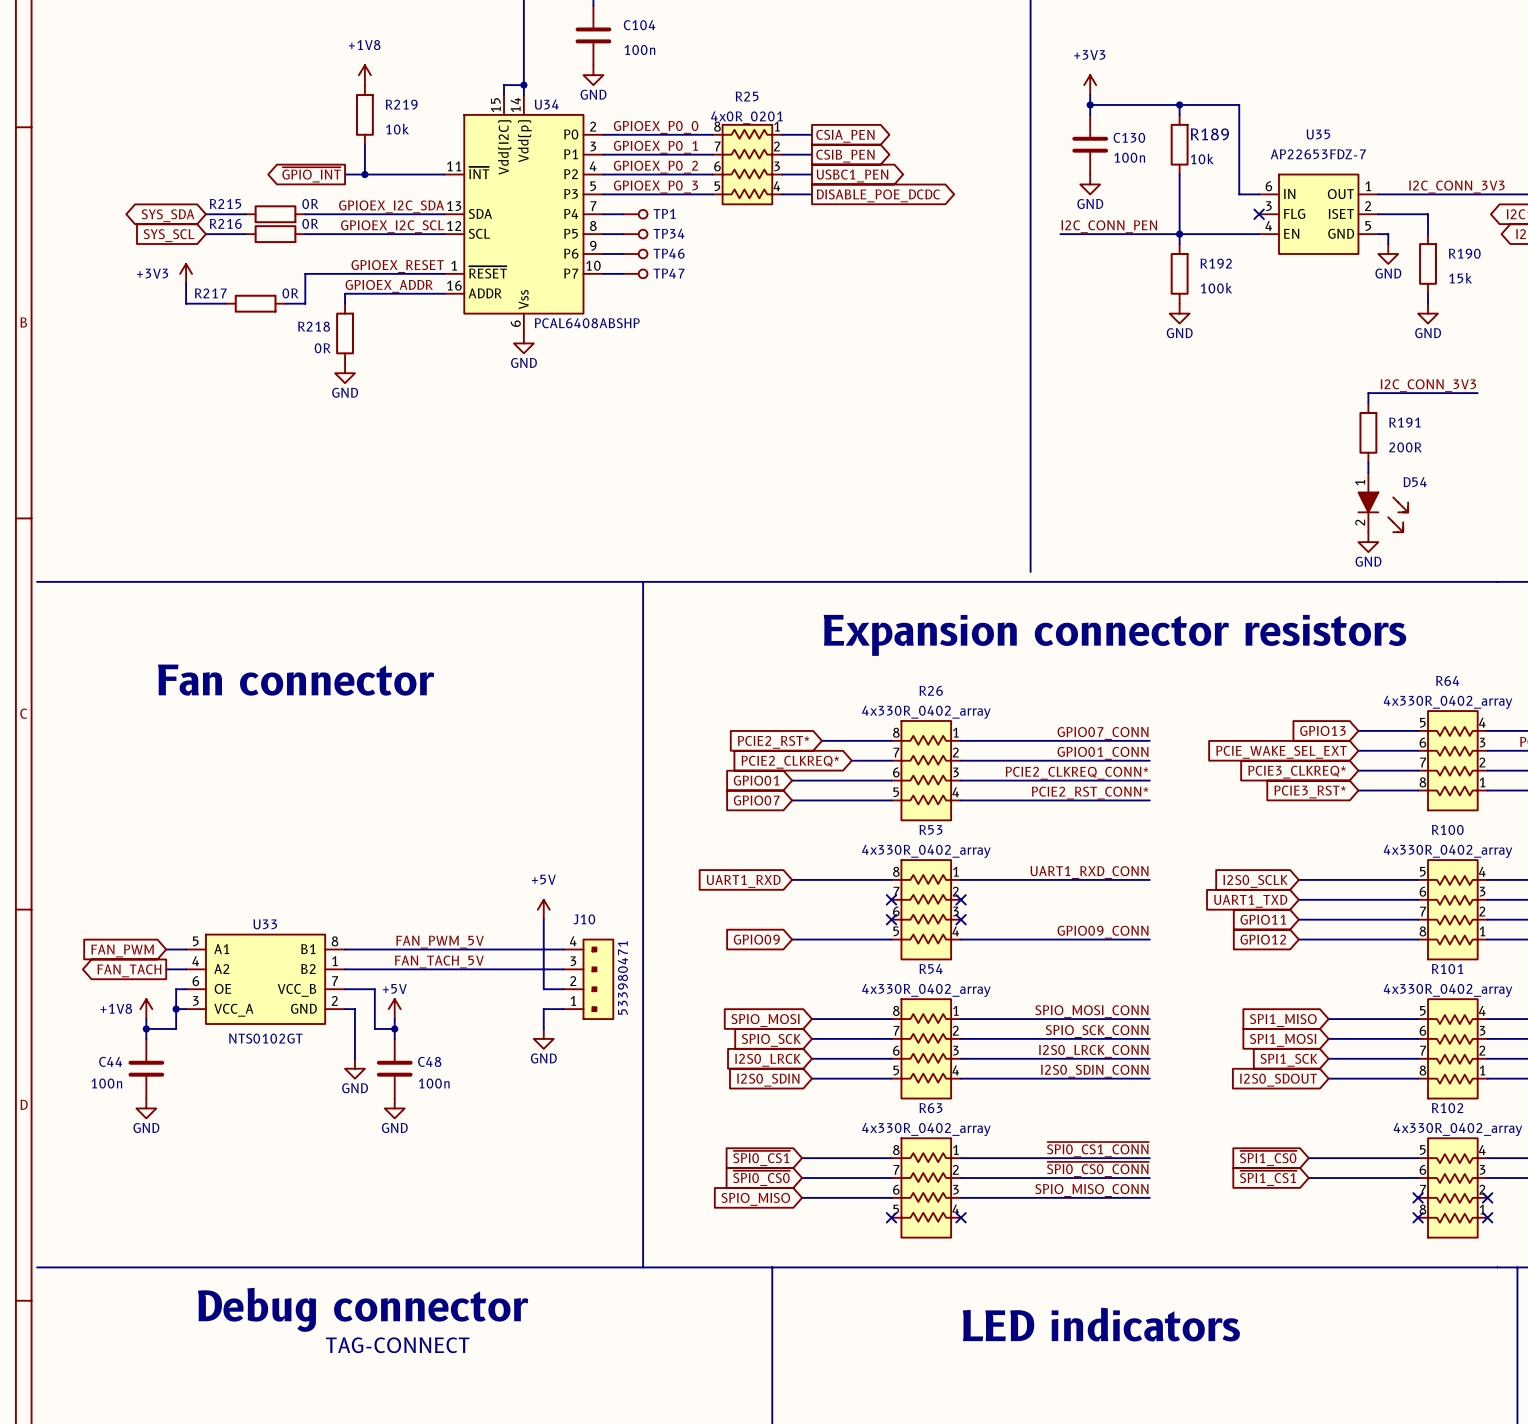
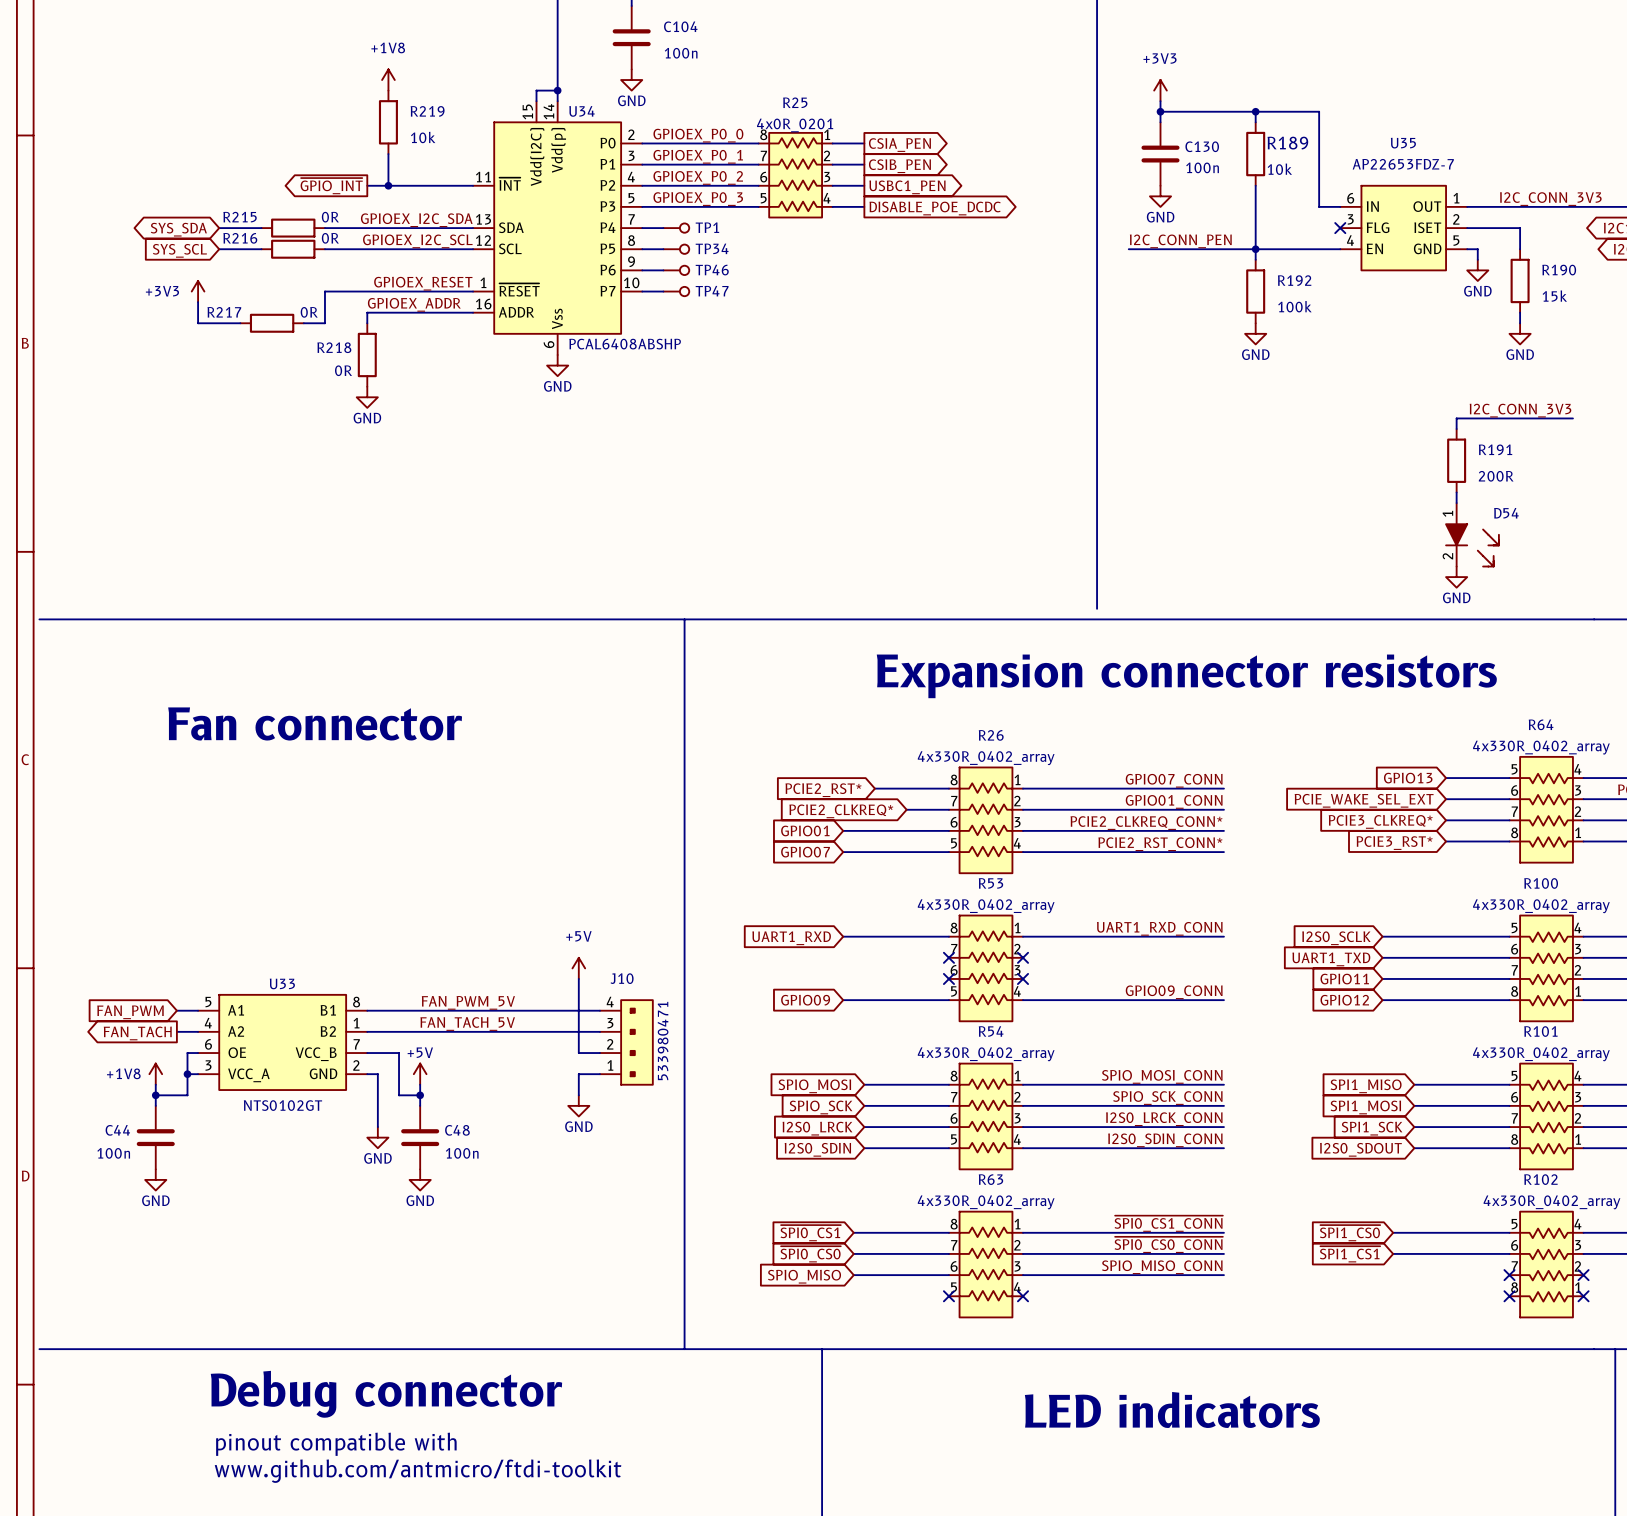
text: TAG-CONNECT (397, 1345) -> none
text: none -> pinout compatible with (336, 1444)
text: none -> www.github.com/antmicro/ftdi-toolkit (418, 1471)

